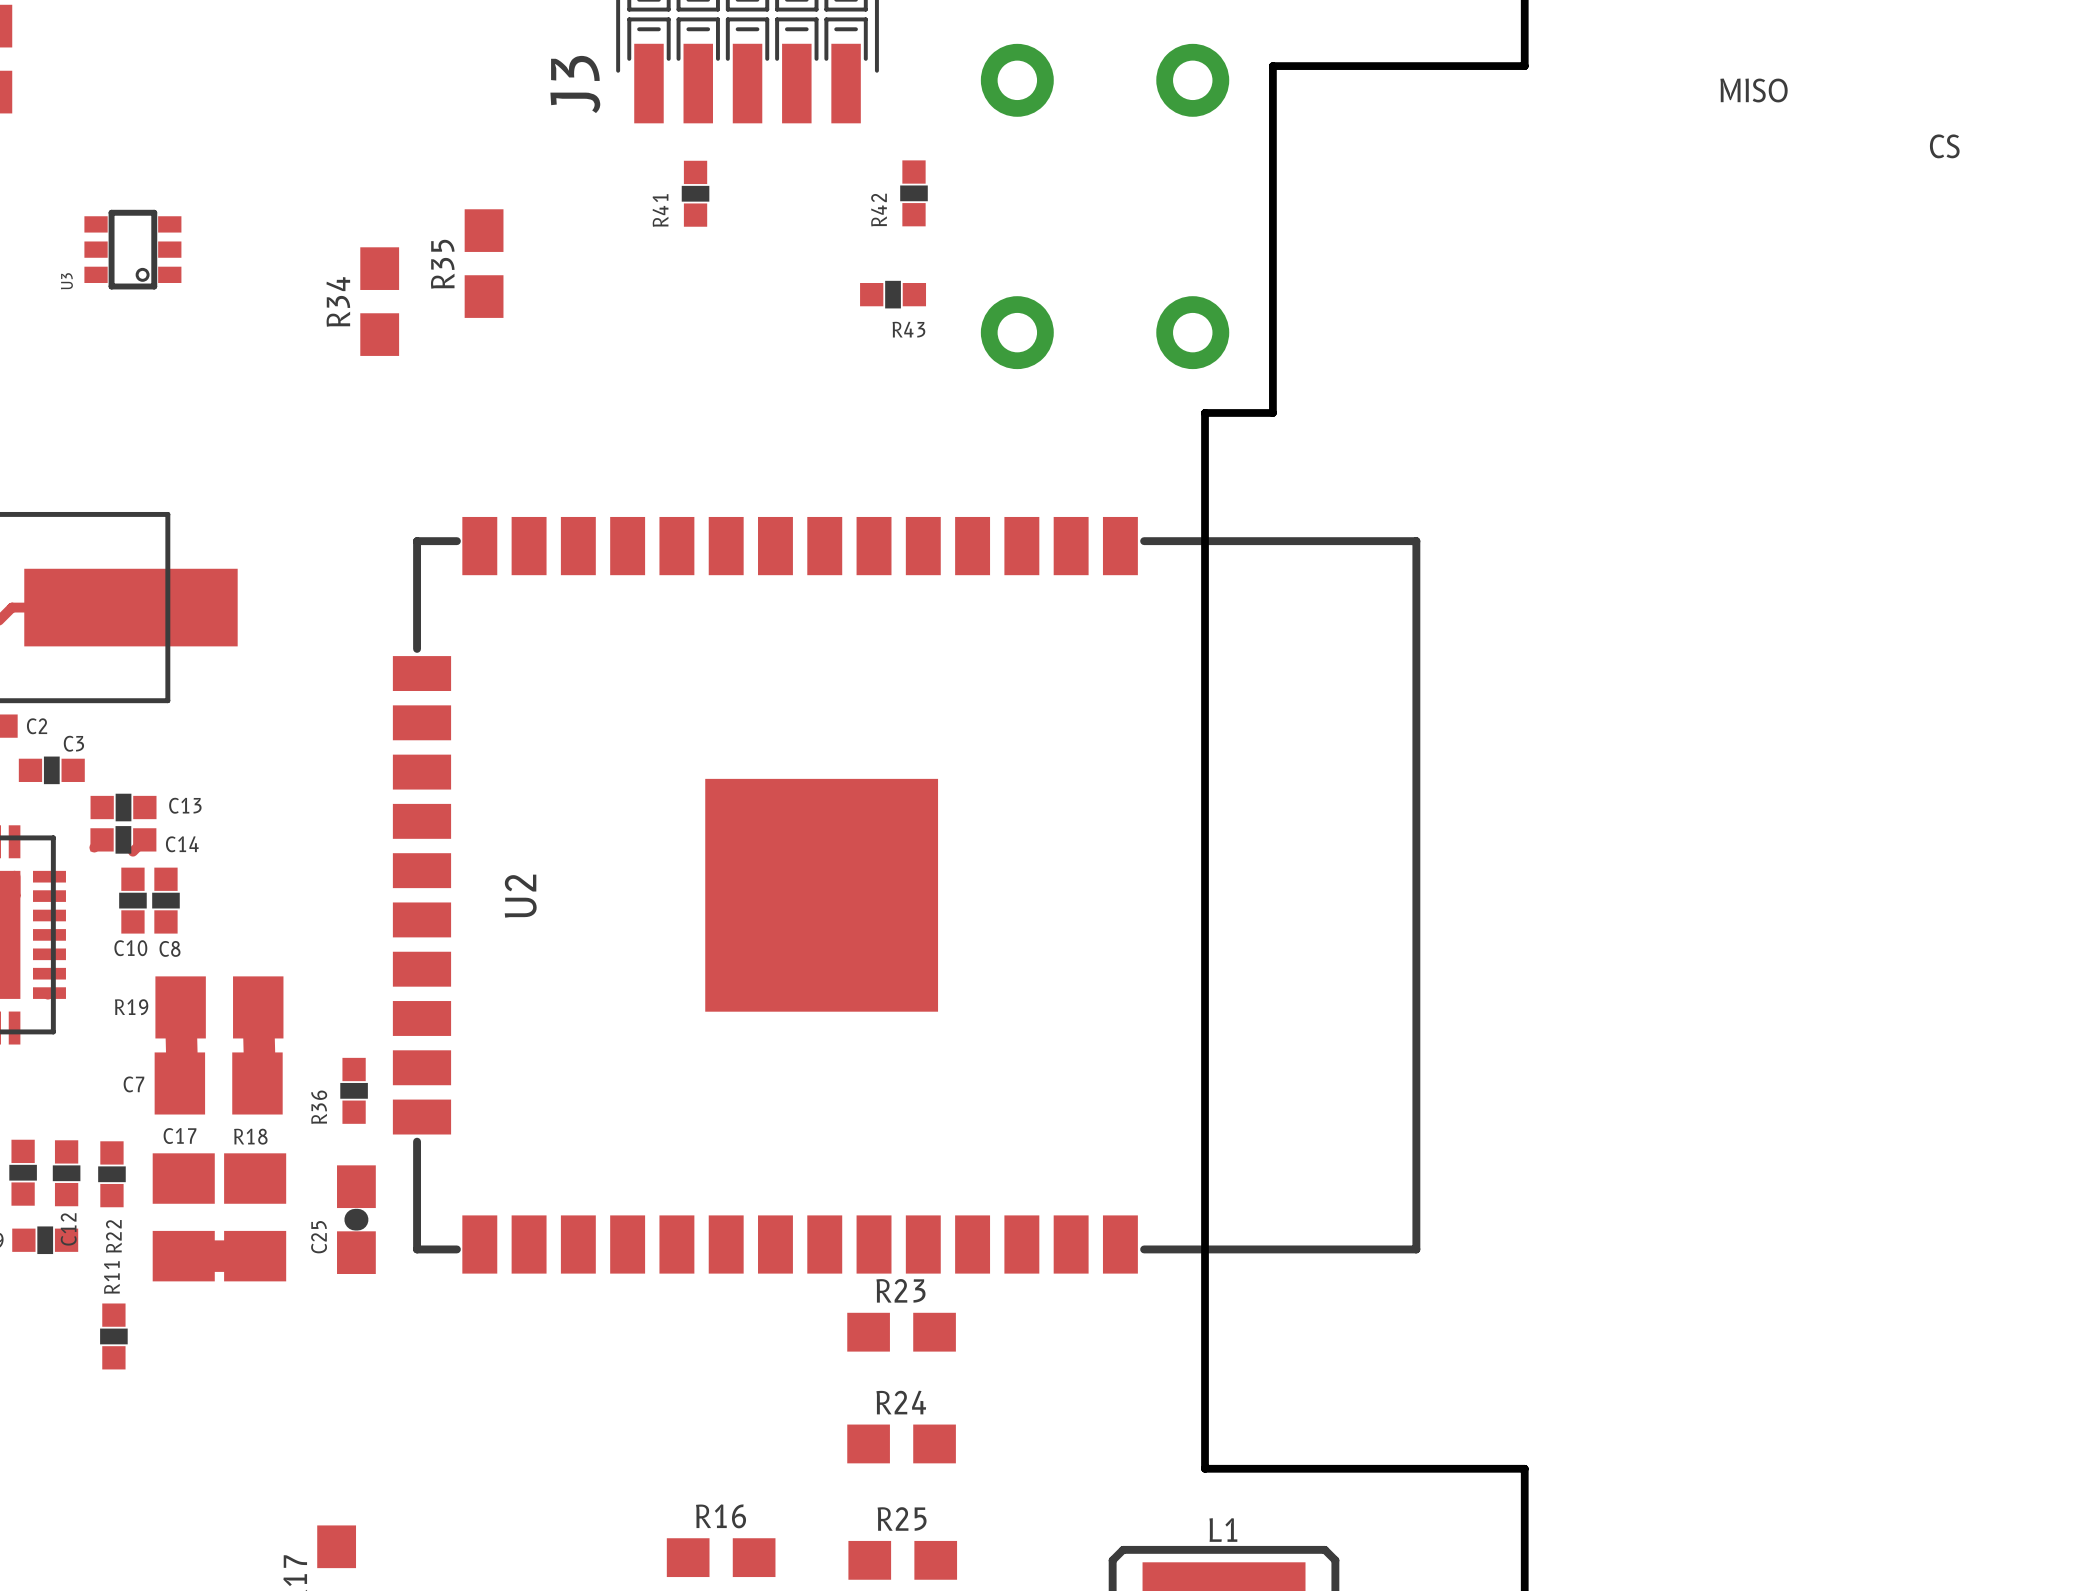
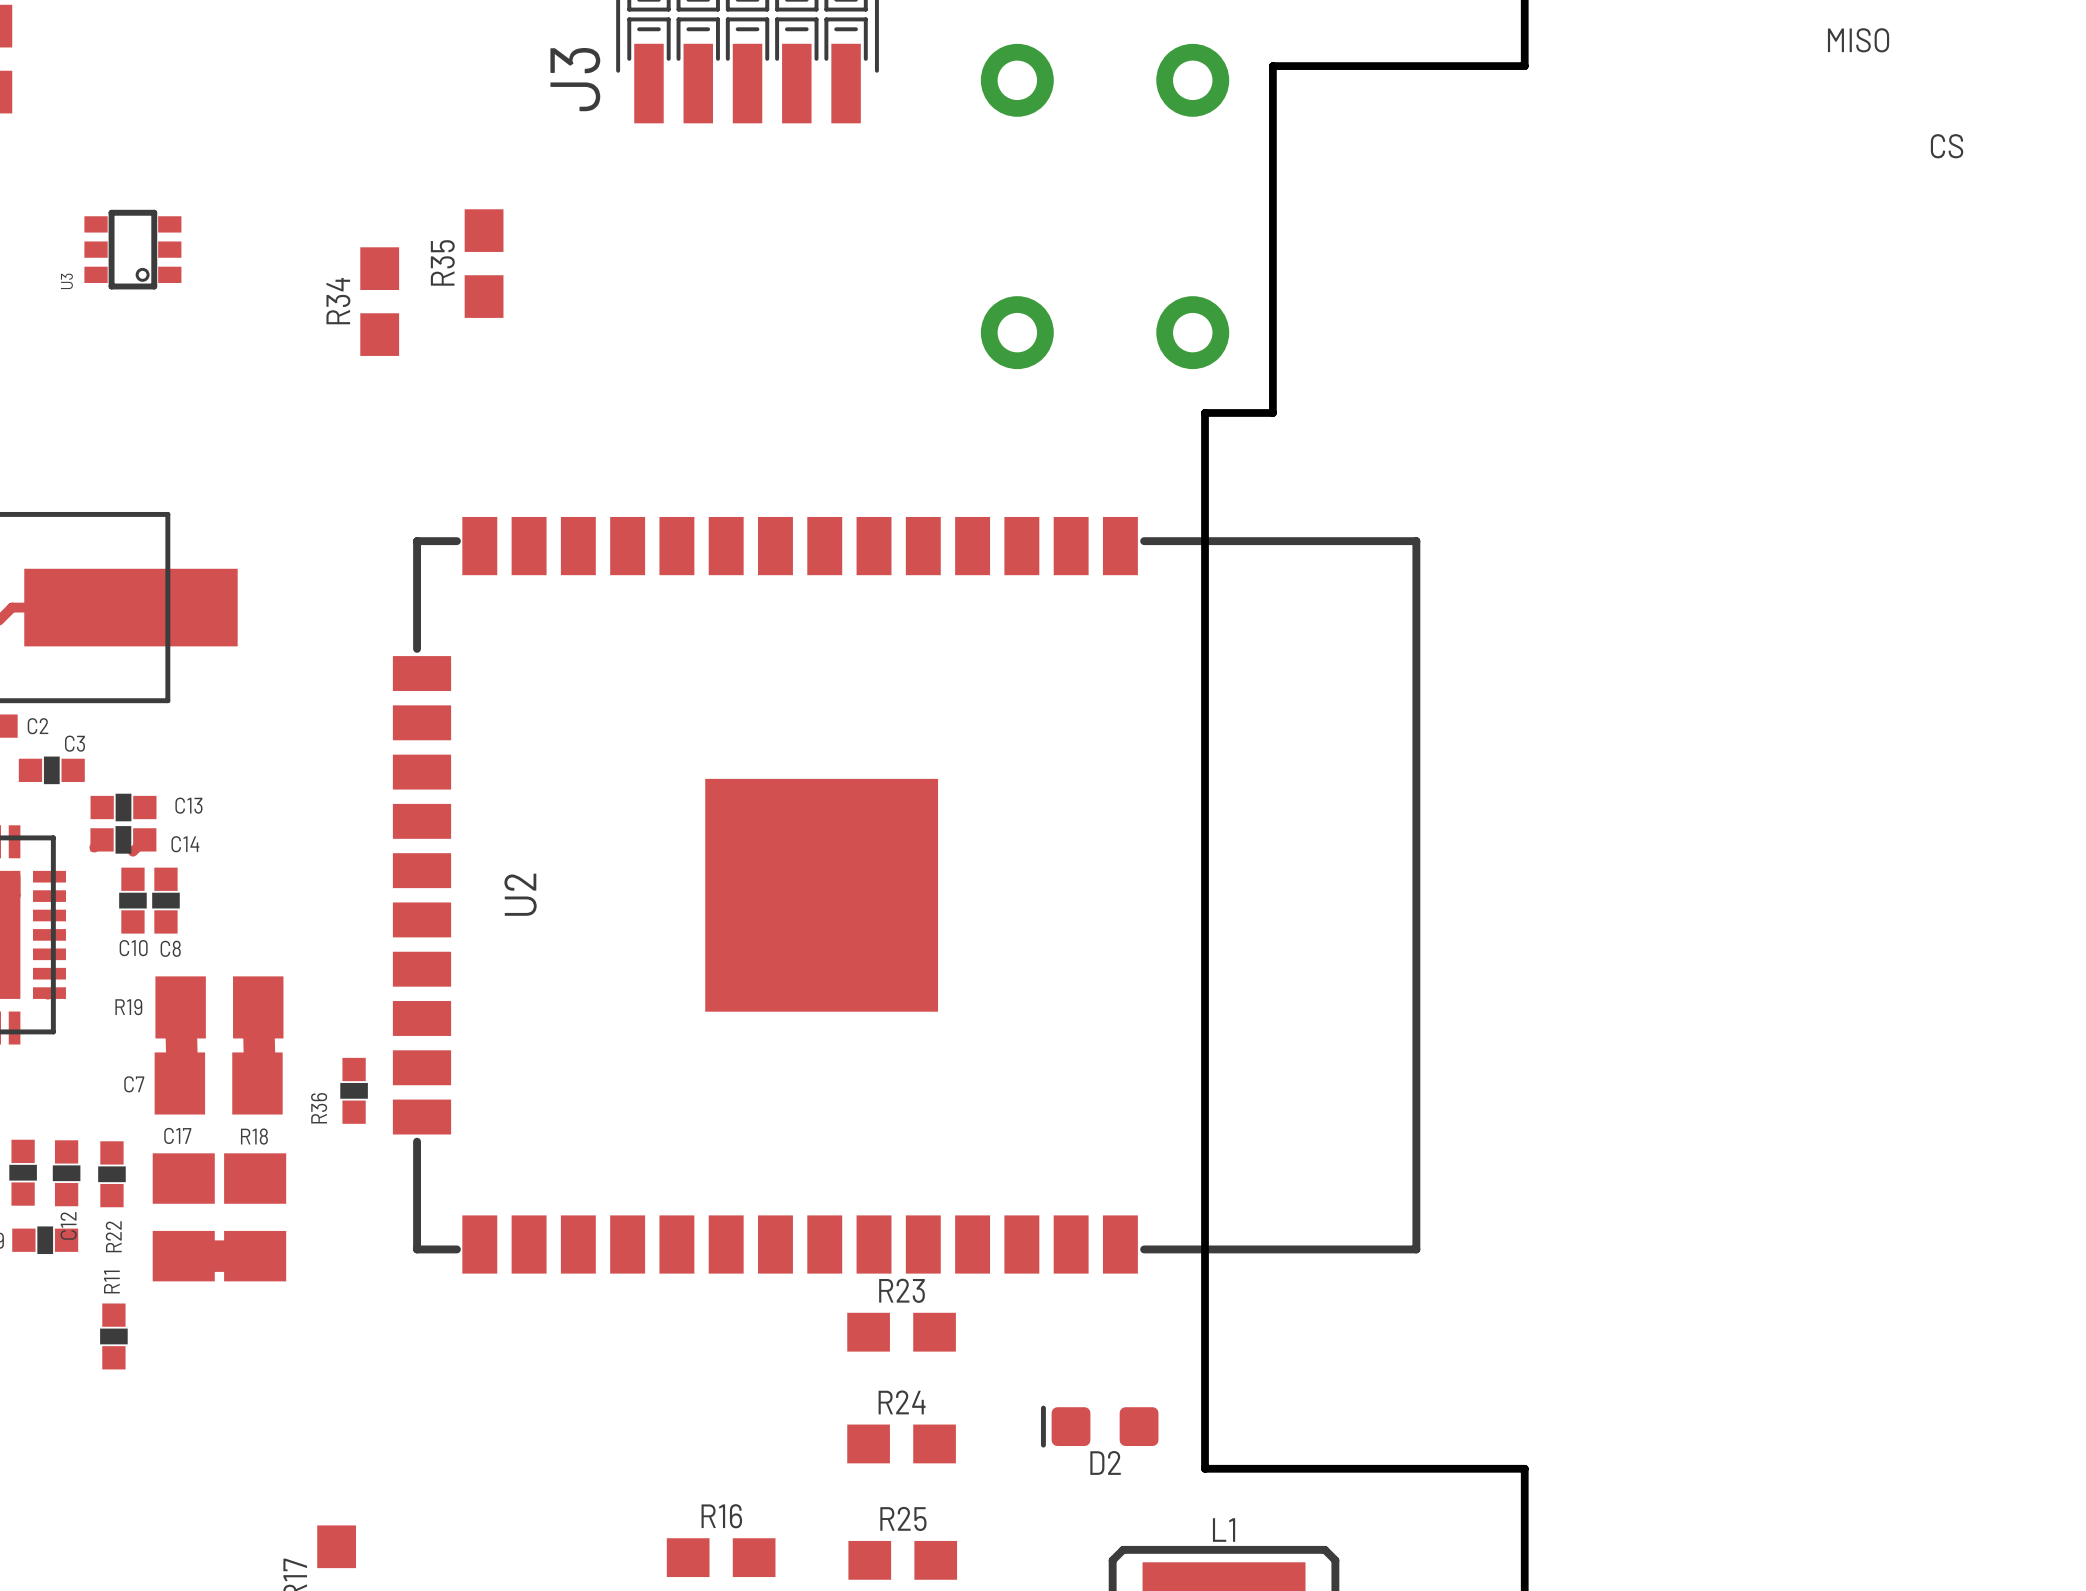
text position: MISO (1754, 90) -> MISO (1858, 40)
R41: (695, 193) -> none
R42: (913, 193) -> none
R43: (893, 294) -> none
C25: (356, 1219) -> none
D2: none -> (1099, 1426)

